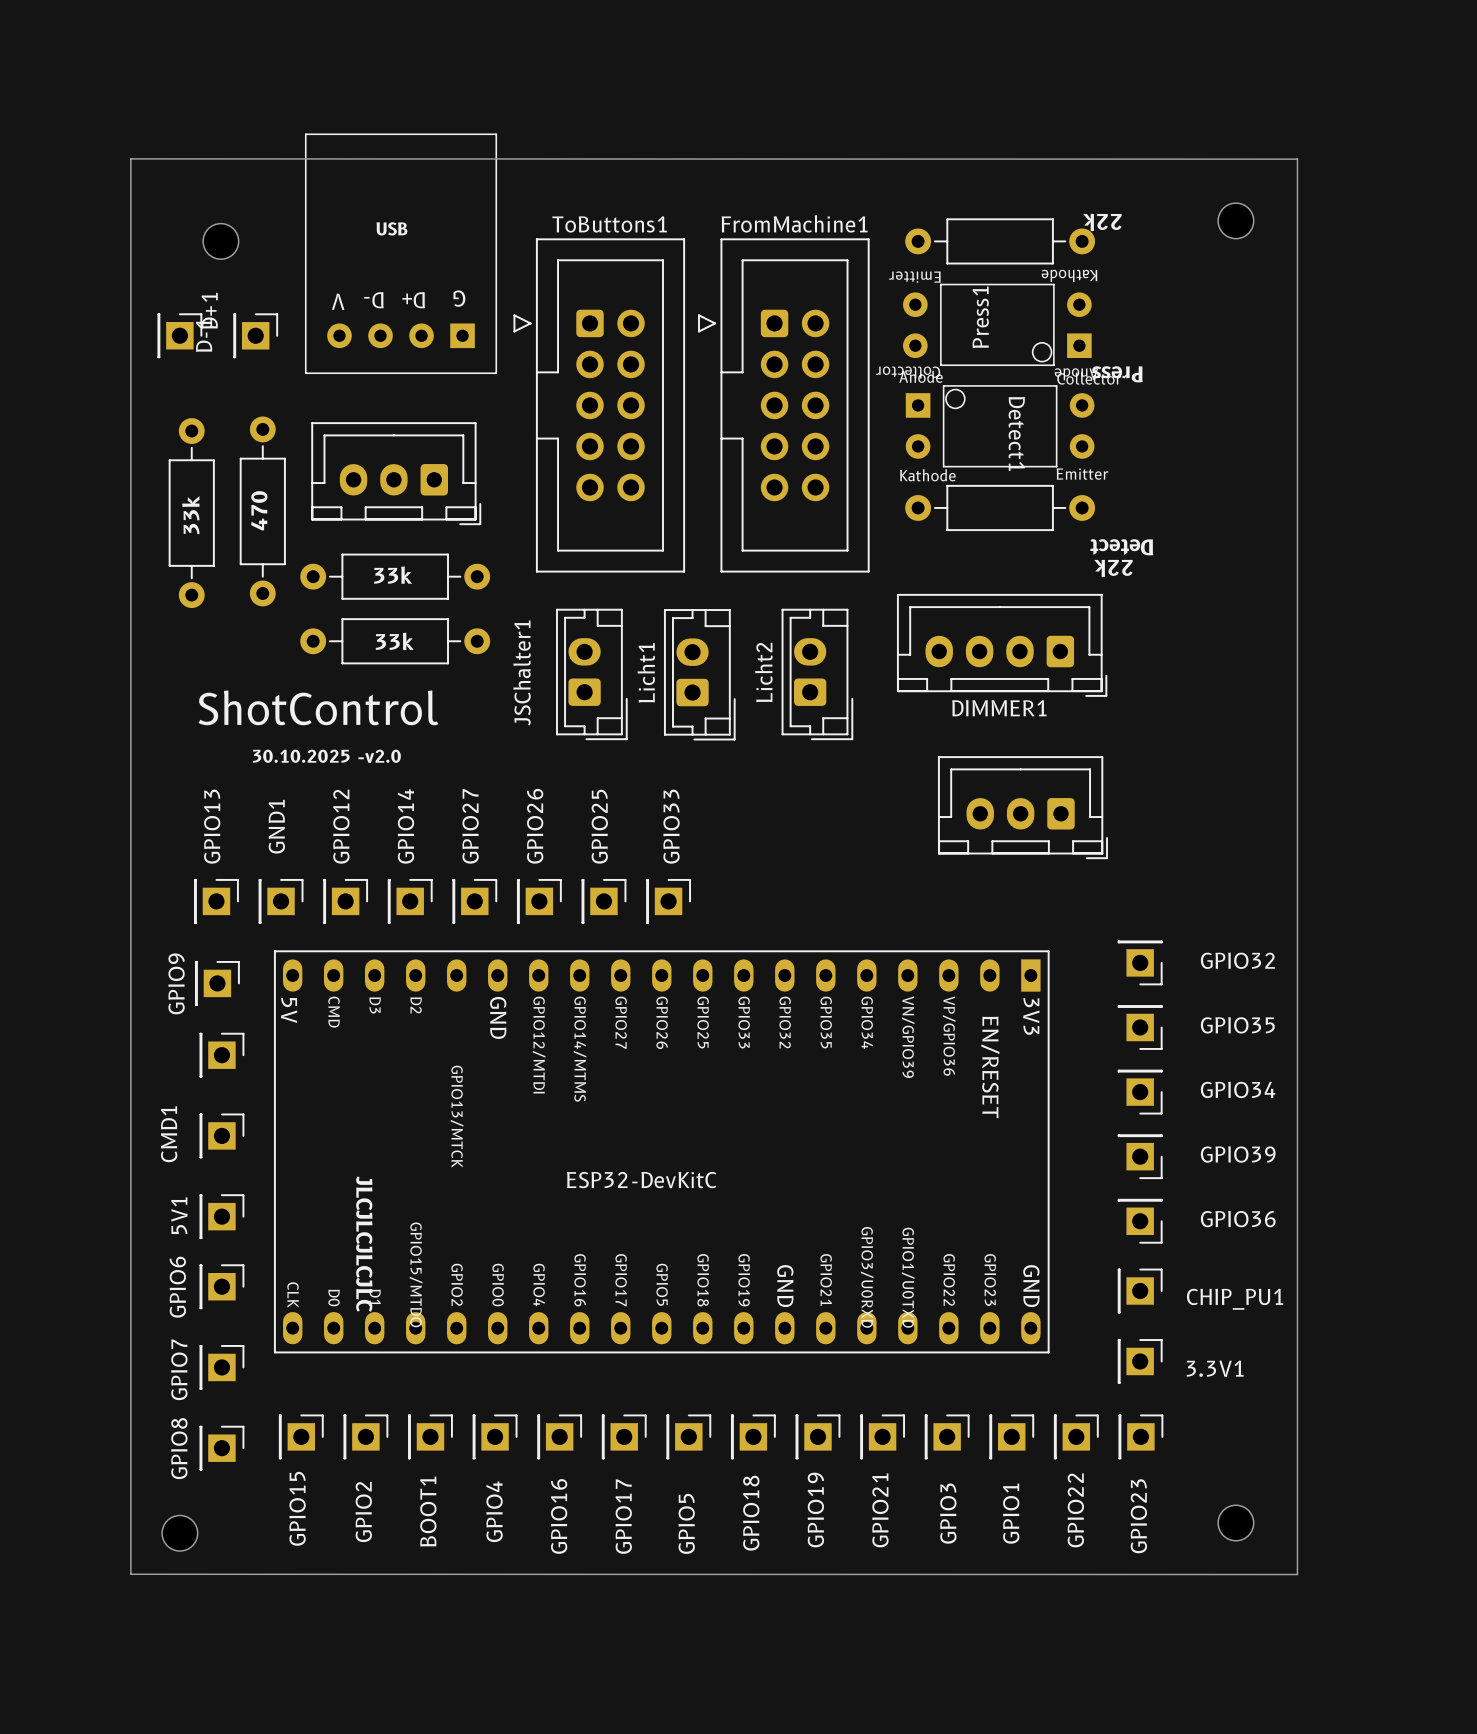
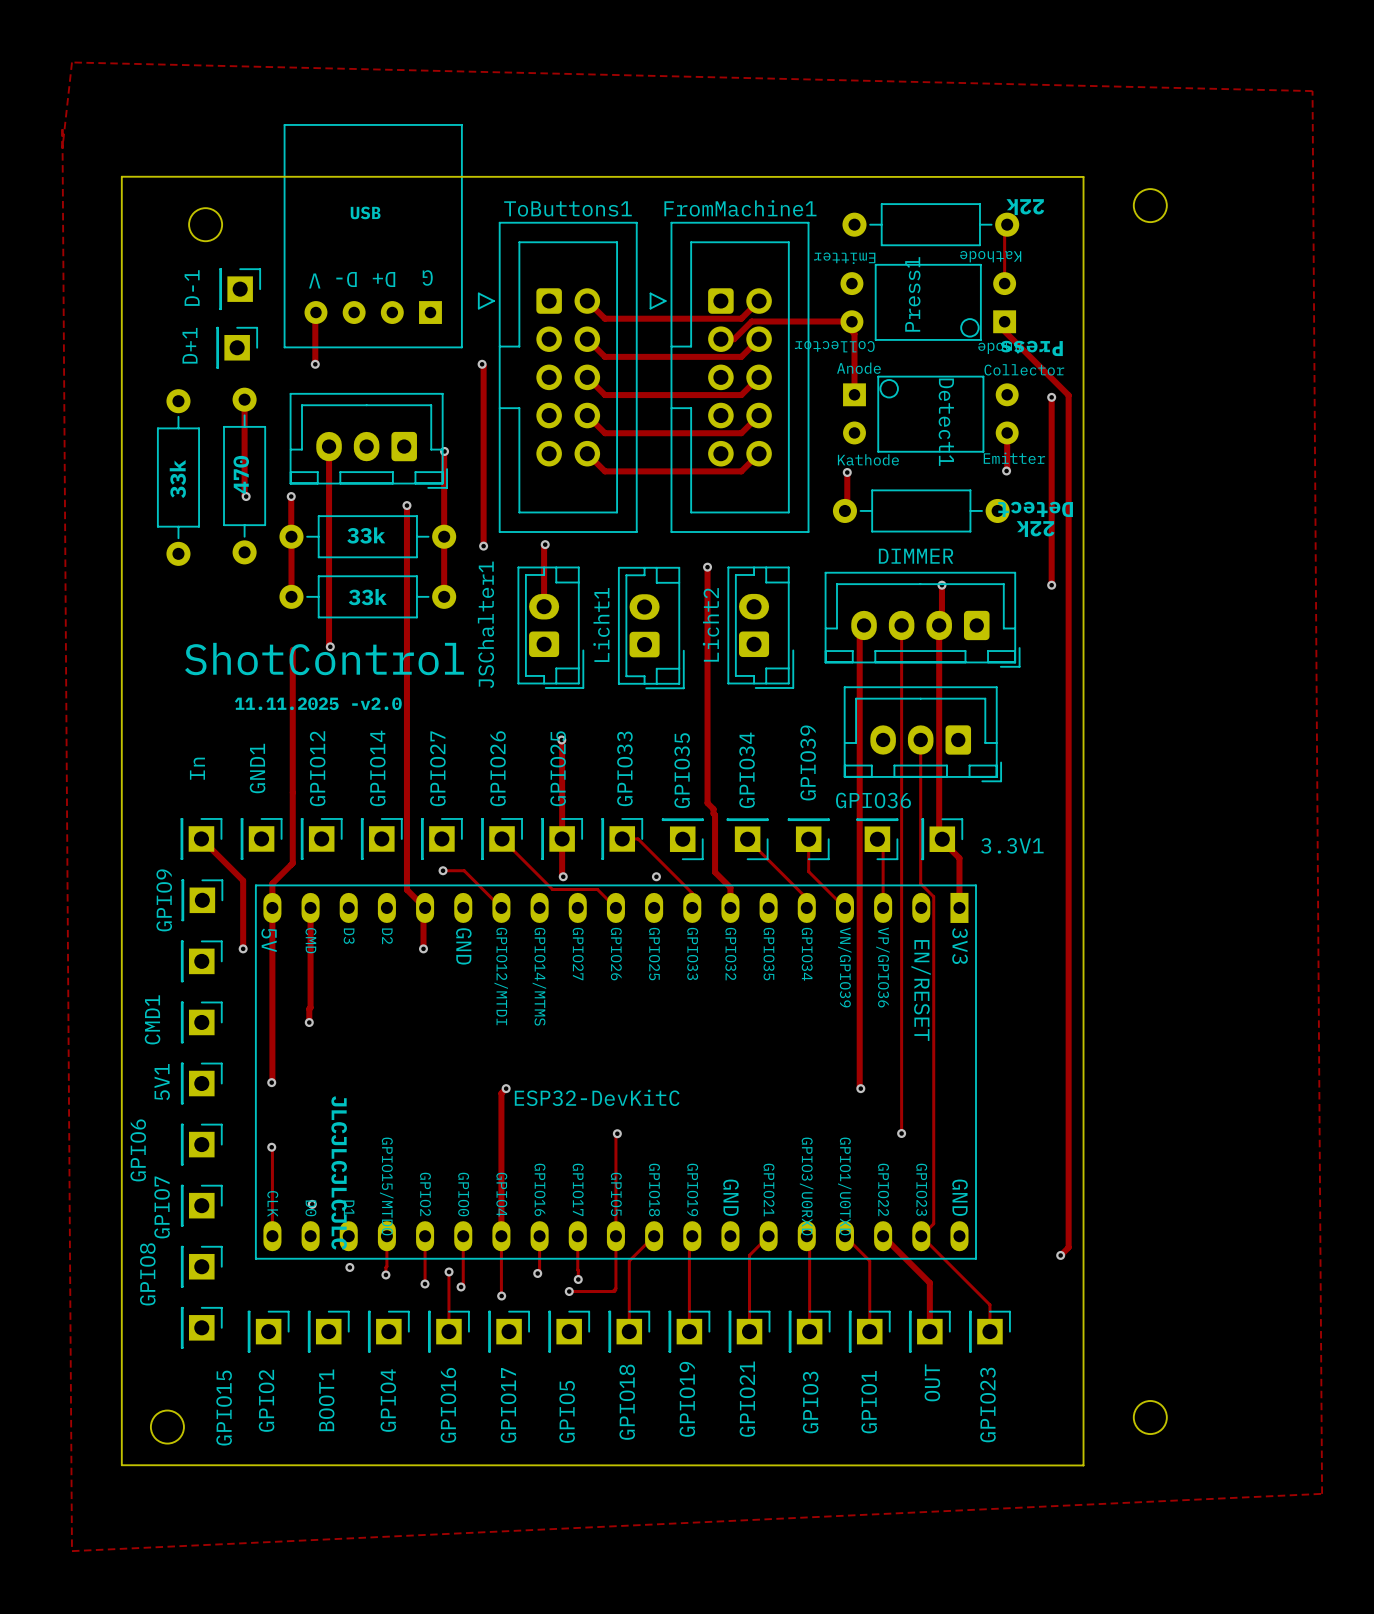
zone outline: none -> (72, 62) (1312, 91) (1322, 1493) (72, 1551) (62, 129) (62, 148) (72, 62)
board edge: (130, 189) (130, 158) (1297, 159) (1297, 1574) (130, 1574) -> (121, 176) (1083, 176) (1083, 1465) (121, 1465)
track: none -> (1007, 224) (1004, 227) (1004, 293)
D+1 name position: D+1 (209, 310) -> D+1 (190, 345)
track: none -> (587, 301) (604, 318) (741, 318) (759, 301)
D+1 position: (179, 335) -> (237, 347)
D-1 position: (255, 335) -> (240, 289)
track: none -> (315, 312) (315, 364)
track: none -> (1004, 331) (1068, 395) (1068, 1247) (1060, 1255)
track: none -> (587, 339) (604, 356) (741, 356) (759, 339)
track: none -> (720, 339) (734, 339) (751, 321) (842, 321) (854, 333) (854, 394)
via: none -> (315, 364)
track: none -> (482, 364) (483, 546)
via: none -> (482, 364)
track: none -> (587, 377) (604, 395) (741, 395) (759, 377)
Detect1 position: (1000, 426) -> (930, 414)
track: none -> (1051, 397) (1051, 585)
via: none -> (1051, 397)
track: none -> (244, 399) (244, 494) (246, 496)
track: none -> (587, 415) (604, 433) (741, 433) (759, 415)
track: none -> (1007, 432) (1006, 470)
track: none -> (329, 446) (330, 646)
track: none -> (444, 451) (444, 596)
via: none -> (444, 451)
track: none -> (587, 453) (604, 471) (741, 471) (759, 453)
via: none -> (1006, 470)
track: none -> (847, 472) (847, 508) (844, 510)
via: none -> (847, 472)
part position: (1000, 507) -> (921, 510)
via: none -> (246, 496)
track: none -> (291, 496) (291, 596)
via: none -> (291, 496)
track: none -> (406, 505) (406, 889) (425, 907) (423, 909) (423, 948)
via: none -> (406, 505)
track: none -> (545, 544) (544, 606)
via: none -> (545, 544)
via: none -> (483, 546)
track: none -> (707, 567) (707, 803) (713, 809) (715, 815) (715, 872) (730, 887) (730, 907)
via: none -> (707, 567)
track: none -> (941, 585) (941, 622) (939, 625) (939, 836) (959, 858) (959, 907)
via: none -> (941, 585)
via: none -> (1051, 585)
DIMMER1: (1002, 645) -> none
DIMMER: none -> (922, 619)
track: none -> (864, 625) (859, 629) (860, 1088)
track: none -> (901, 625) (901, 1133)
via: none -> (330, 646)
track: none -> (292, 649) (292, 863) (272, 883) (271, 1082)
text: 30.10.2025 -v2.0 (326, 756) -> 11.11.2025 -v2.0 (318, 703)
track: none -> (561, 739) (563, 876)
via: none -> (561, 739)
track: none -> (920, 739) (920, 883) (933, 896) (933, 1223) (921, 1236) (989, 1304) (989, 1331)
part position: (1022, 807) -> (922, 734)
GPIO13 name: GPIO13 (212, 826) -> In (197, 768)
track: none -> (201, 838) (243, 880) (243, 948)
track: none -> (502, 838) (552, 889) (597, 889) (615, 907)
track: none -> (622, 838) (638, 838) (692, 893) (692, 907)
track: none -> (747, 839) (806, 898) (806, 907)
track: none -> (808, 839) (808, 871) (844, 907)
track: none -> (877, 839) (883, 844) (883, 907)
track: none -> (443, 870) (464, 870) (501, 907)
via: none -> (443, 870)
via: none -> (563, 876)
via: none -> (656, 876)
GPIO32: (1140, 962) -> none
track: none -> (310, 907) (309, 1022)
GPIO9 position: (217, 983) -> (202, 900)
via: none -> (243, 948)
via: none -> (423, 948)
GPIO35 name rotation: 0° (1237, 1025) -> 90° counterclockwise (682, 770)
GPIO35 name position: GPIO35 (1237, 1025) -> GPIO35 (682, 770)
GPIO35 position: (1140, 1027) -> (682, 839)
part position: (221, 1055) -> (201, 961)
GPIO34 name rotation: 0° (1238, 1089) -> 90° counterclockwise (747, 770)
GPIO34 name position: GPIO34 (1238, 1089) -> GPIO34 (747, 770)
GPIO34 position: (1140, 1092) -> (747, 839)
via: none -> (309, 1022)
text: GPIO13/MTCK (457, 1116) -> none
CMD1 position: (221, 1135) -> (201, 1022)
GPIO39 name rotation: 0° (1238, 1154) -> 90° counterclockwise (808, 762)
GPIO39 name position: GPIO39 (1238, 1154) -> GPIO39 (808, 762)
GPIO39 position: (1140, 1156) -> (808, 839)
via: none -> (271, 1082)
track: none -> (506, 1088) (501, 1093) (501, 1296)
via: none -> (506, 1088)
via: none -> (860, 1088)
5V1 position: (221, 1216) -> (201, 1083)
via: none -> (901, 1133)
track: none -> (617, 1133) (615, 1288) (612, 1291)
via: none -> (617, 1133)
GPIO36 name position: GPIO36 (1238, 1219) -> GPIO36 (873, 800)
GPIO36 position: (1140, 1221) -> (877, 839)
track: none -> (271, 1147) (272, 1236)
via: none -> (271, 1147)
GPIO6 position: (221, 1286) -> (201, 1144)
GPIO6 name position: GPIO6 (177, 1287) -> GPIO6 (138, 1150)
CHIP_PU1: (1140, 1291) -> none
via: none -> (312, 1204)
track: none -> (386, 1236) (385, 1274)
track: none -> (425, 1236) (425, 1283)
track: none -> (463, 1236) (463, 1284) (461, 1287)
track: none -> (539, 1236) (539, 1271) (537, 1273)
track: none -> (577, 1236) (578, 1279)
track: none -> (654, 1236) (629, 1261) (629, 1331)
track: none -> (692, 1236) (689, 1239) (689, 1331)
track: none -> (768, 1236) (749, 1255) (749, 1331)
track: none -> (806, 1236) (809, 1239) (809, 1331)
track: none -> (844, 1236) (869, 1260) (869, 1331)
track: none -> (883, 1236) (929, 1282) (929, 1331)
via: none -> (1060, 1255)
via: none -> (349, 1267)
3.3V1 position: (1140, 1361) -> (942, 839)
track: none -> (448, 1272) (448, 1331)
via: none -> (449, 1271)
GPIO7 position: (221, 1367) -> (201, 1205)
via: none -> (537, 1273)
via: none -> (385, 1274)
via: none -> (578, 1279)
via: none -> (425, 1283)
via: none -> (461, 1287)
track: none -> (615, 1290) (569, 1291)
via: none -> (569, 1291)
via: none -> (501, 1296)
OUT: none -> (929, 1331)
GPIO15 position: (301, 1436) -> (201, 1327)
GPIO2 position: (365, 1436) -> (268, 1331)
BOOT1 position: (430, 1436) -> (328, 1331)
GPIO4 position: (495, 1436) -> (388, 1331)
GPIO16 position: (559, 1436) -> (448, 1331)
GPIO17 position: (624, 1436) -> (509, 1331)
GPIO5 position: (688, 1436) -> (569, 1331)
GPIO18 position: (753, 1436) -> (629, 1331)
GPIO19 position: (817, 1436) -> (689, 1331)
GPIO21 position: (882, 1436) -> (749, 1331)
GPIO3 position: (947, 1436) -> (809, 1331)
GPIO1 position: (1011, 1436) -> (869, 1331)
GPIO22: (1076, 1436) -> none
GPIO23 position: (1140, 1436) -> (989, 1331)
GPIO8 name position: GPIO8 (179, 1448) -> GPIO8 (147, 1274)
GPIO8 position: (221, 1448) -> (201, 1266)
GPIO15 name position: GPIO15 (297, 1508) -> GPIO15 (224, 1408)

